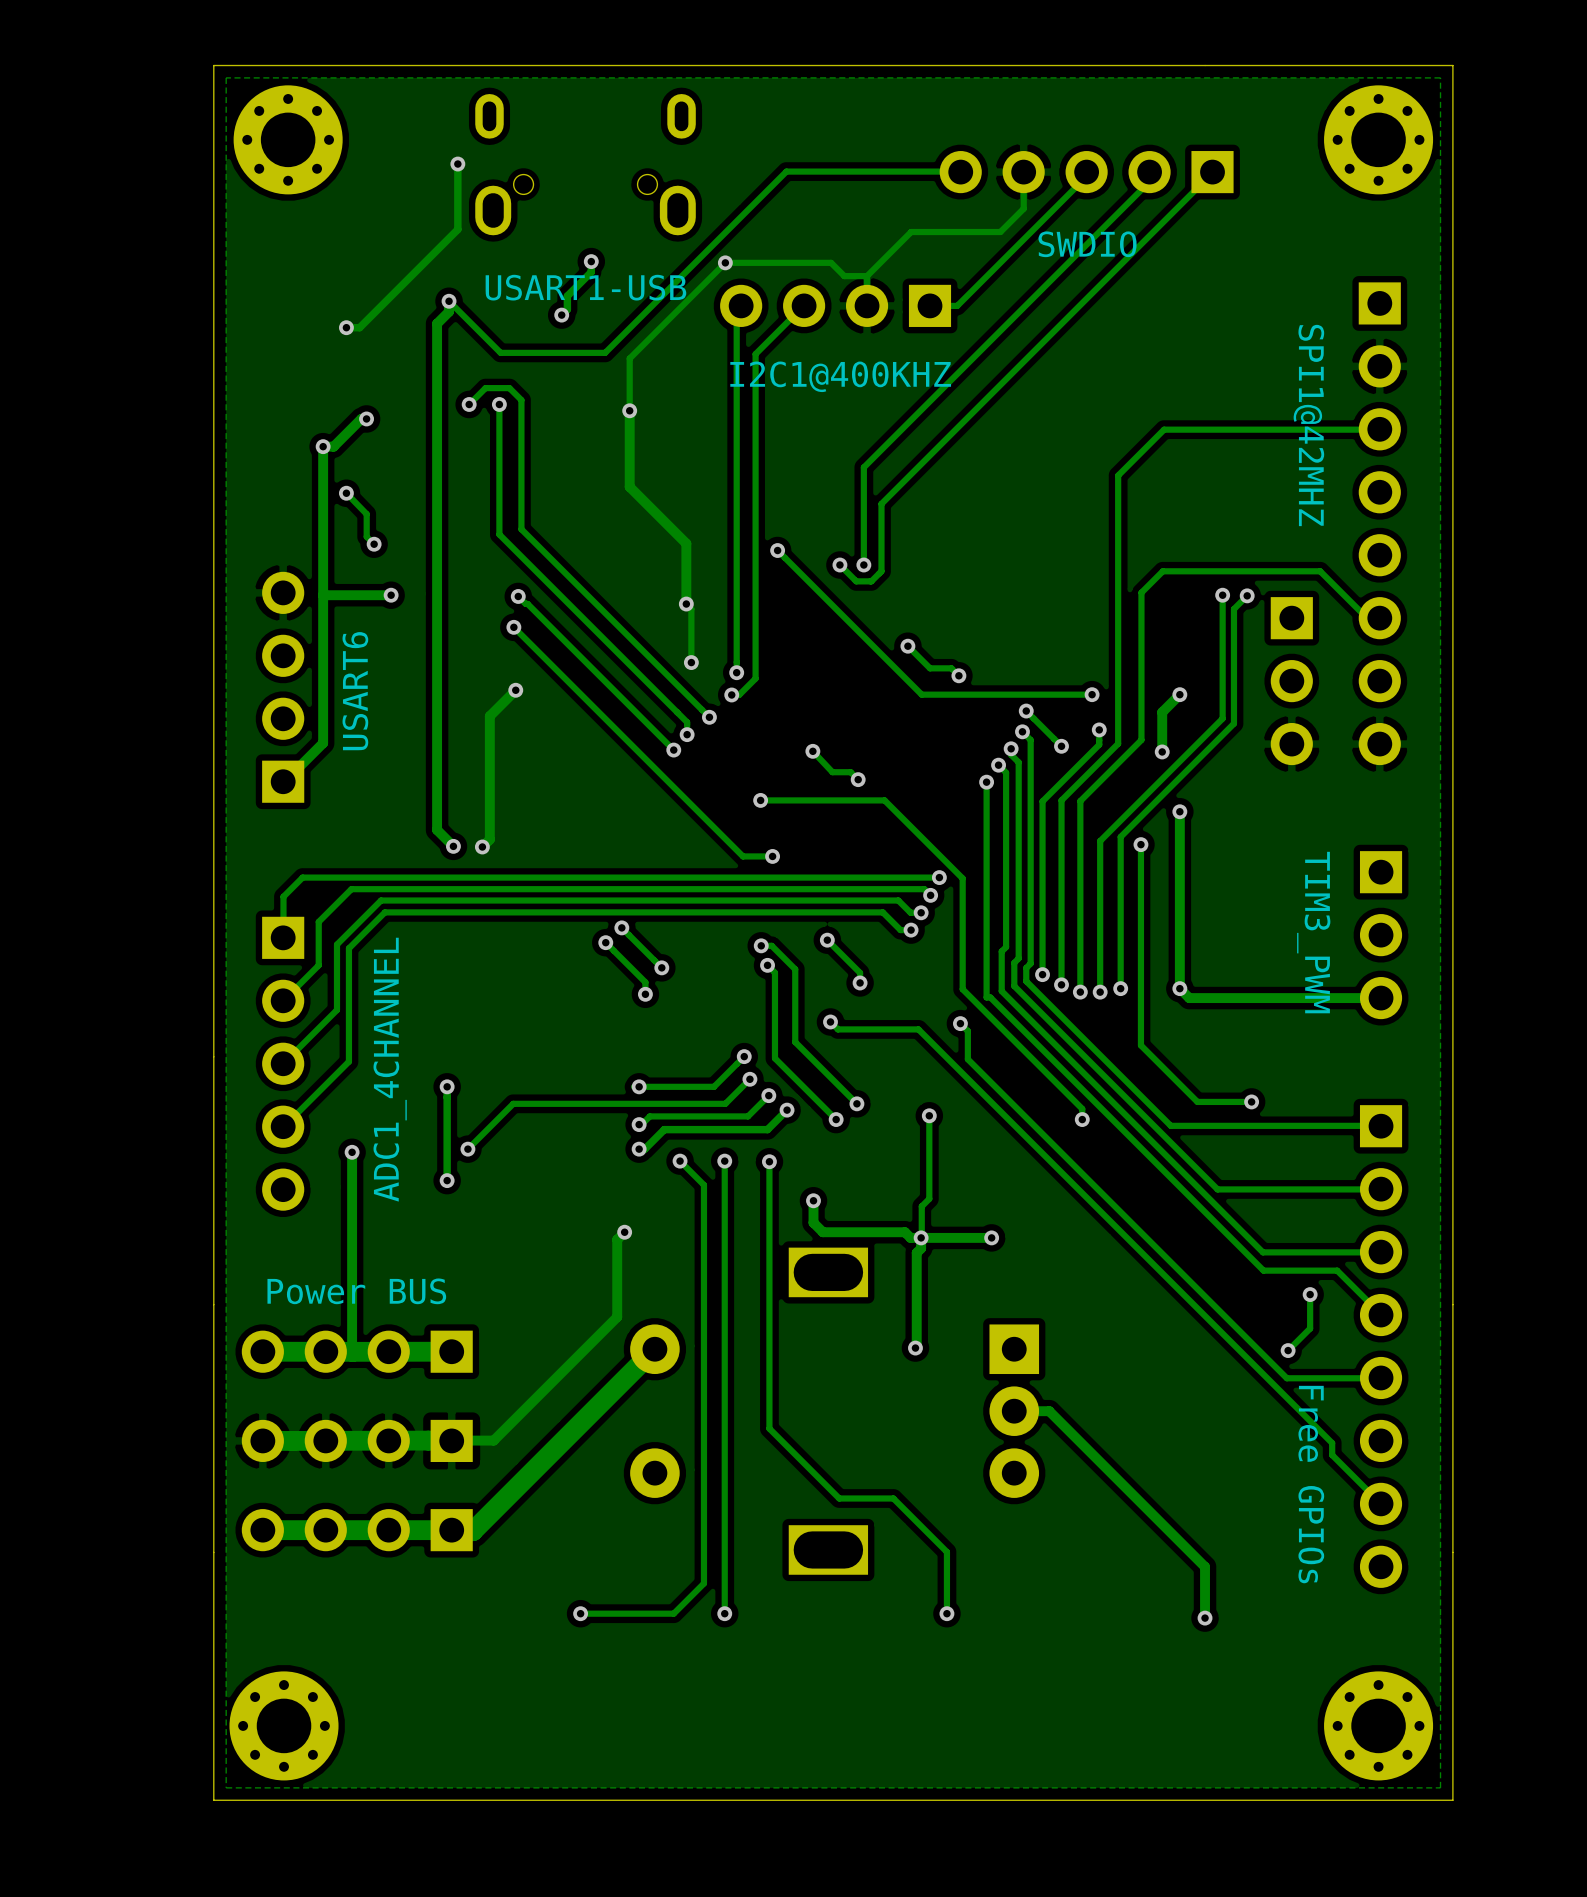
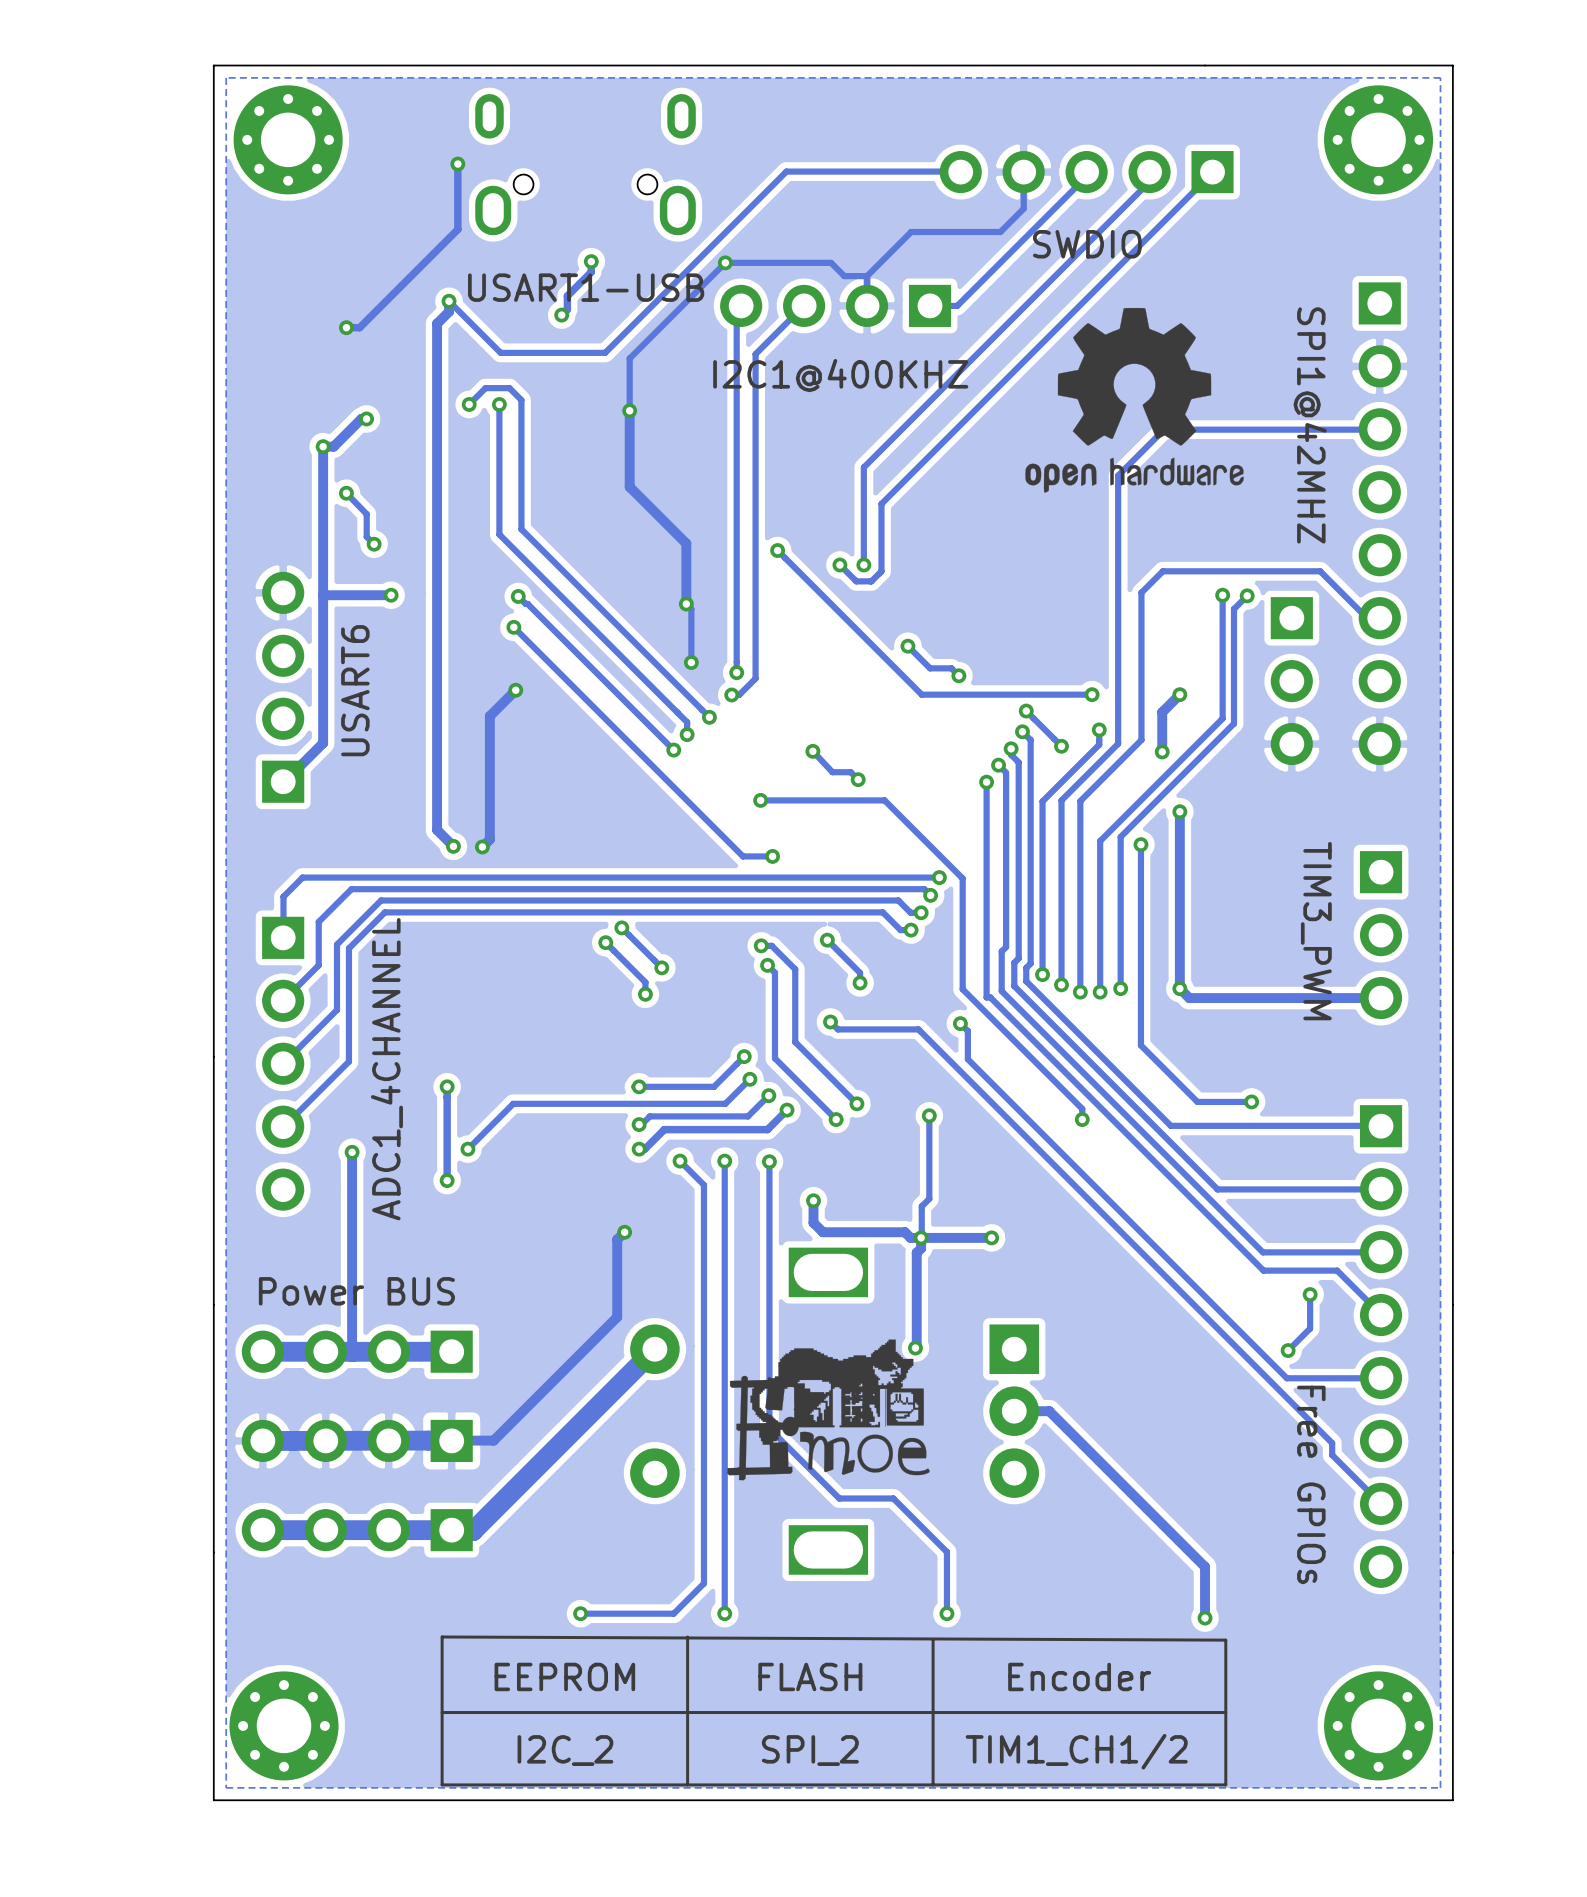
drawing: none -> [1025, 307, 1244, 493]
drawing: none -> [727, 1339, 930, 1481]
line: none -> (442, 1636) (1225, 1640) (1225, 1784) (442, 1784) (442, 1636)
line: none -> (687, 1636) (687, 1784)
line: none -> (933, 1640) (933, 1784)
text: none -> EEPROM (564, 1676)
text: none -> FLASH (810, 1676)
text: none -> Encoder (1079, 1676)
line: none -> (1225, 1712) (442, 1712)
text: none -> I2C_2 (565, 1750)
text: none -> SPI_2 (810, 1750)
text: none -> TIM1_CH1/2 (1076, 1751)

